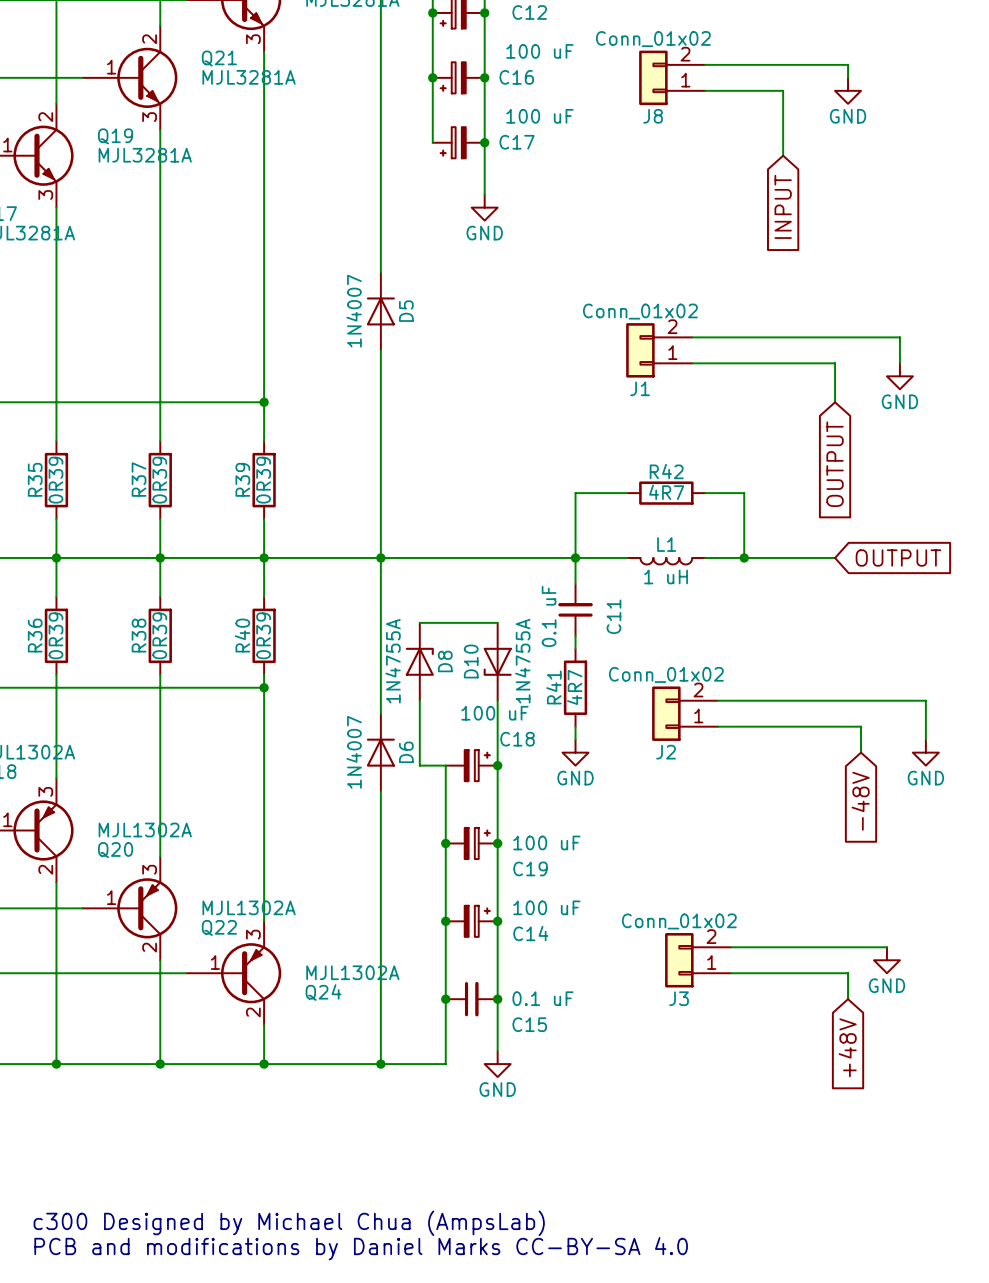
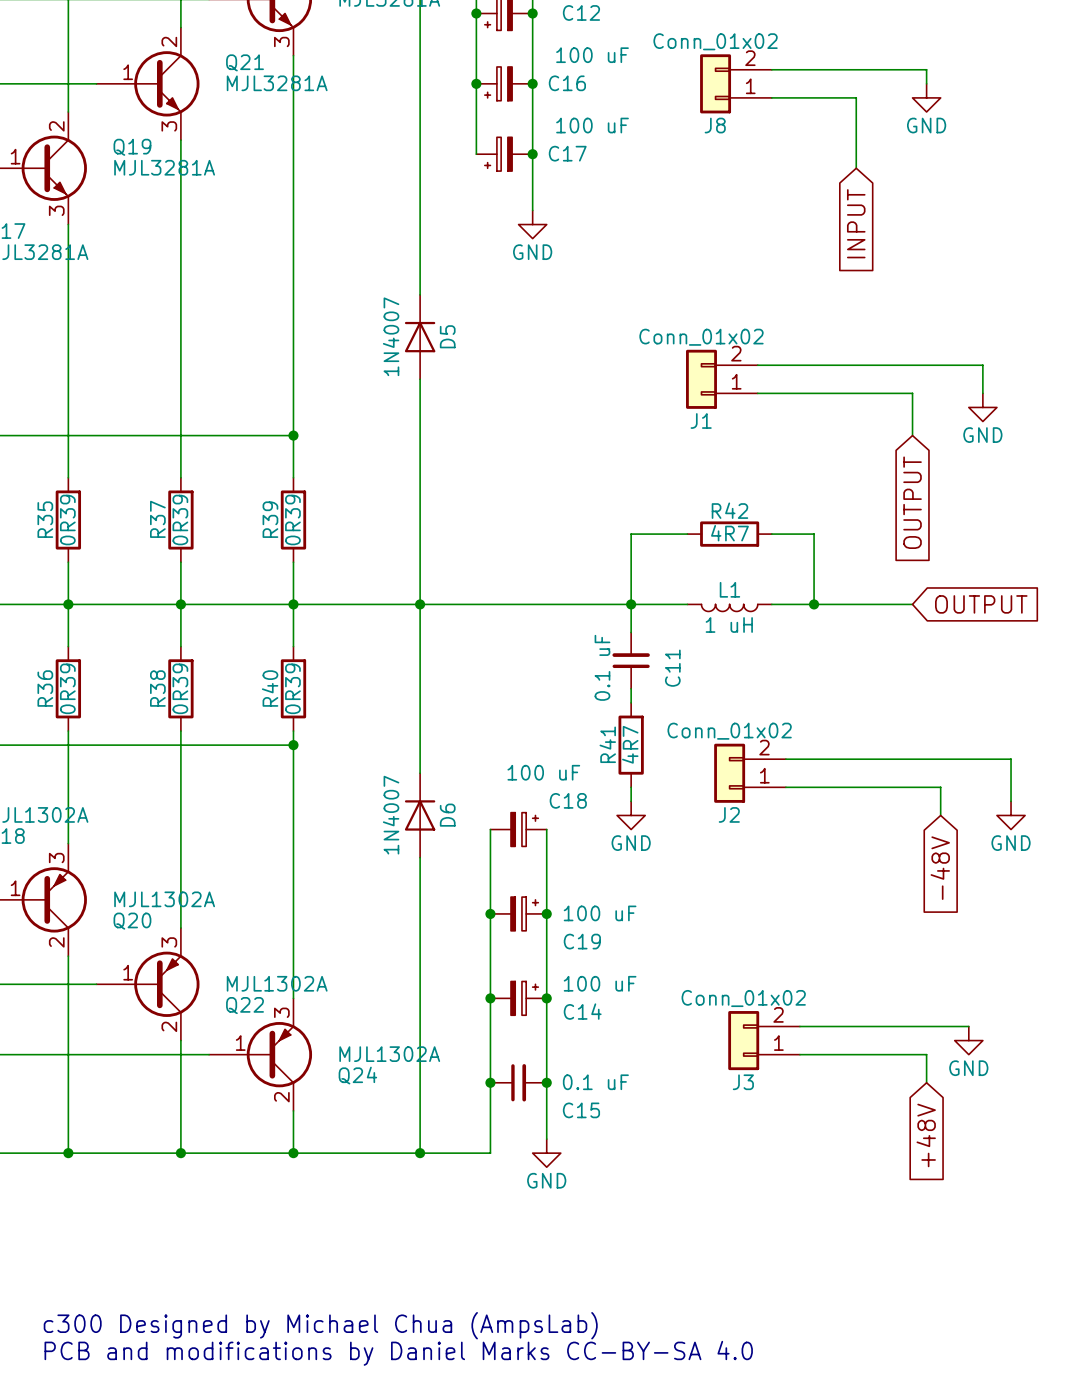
wire: (419, 622) (497, 622) -> none
D8: 1N4755A (419, 661) -> none
D10: 1N4755A (497, 661) -> none
wire: (419, 700) (419, 765) (445, 765) -> none
wire: (497, 700) (497, 765) -> none
junction: (497, 765) -> none

